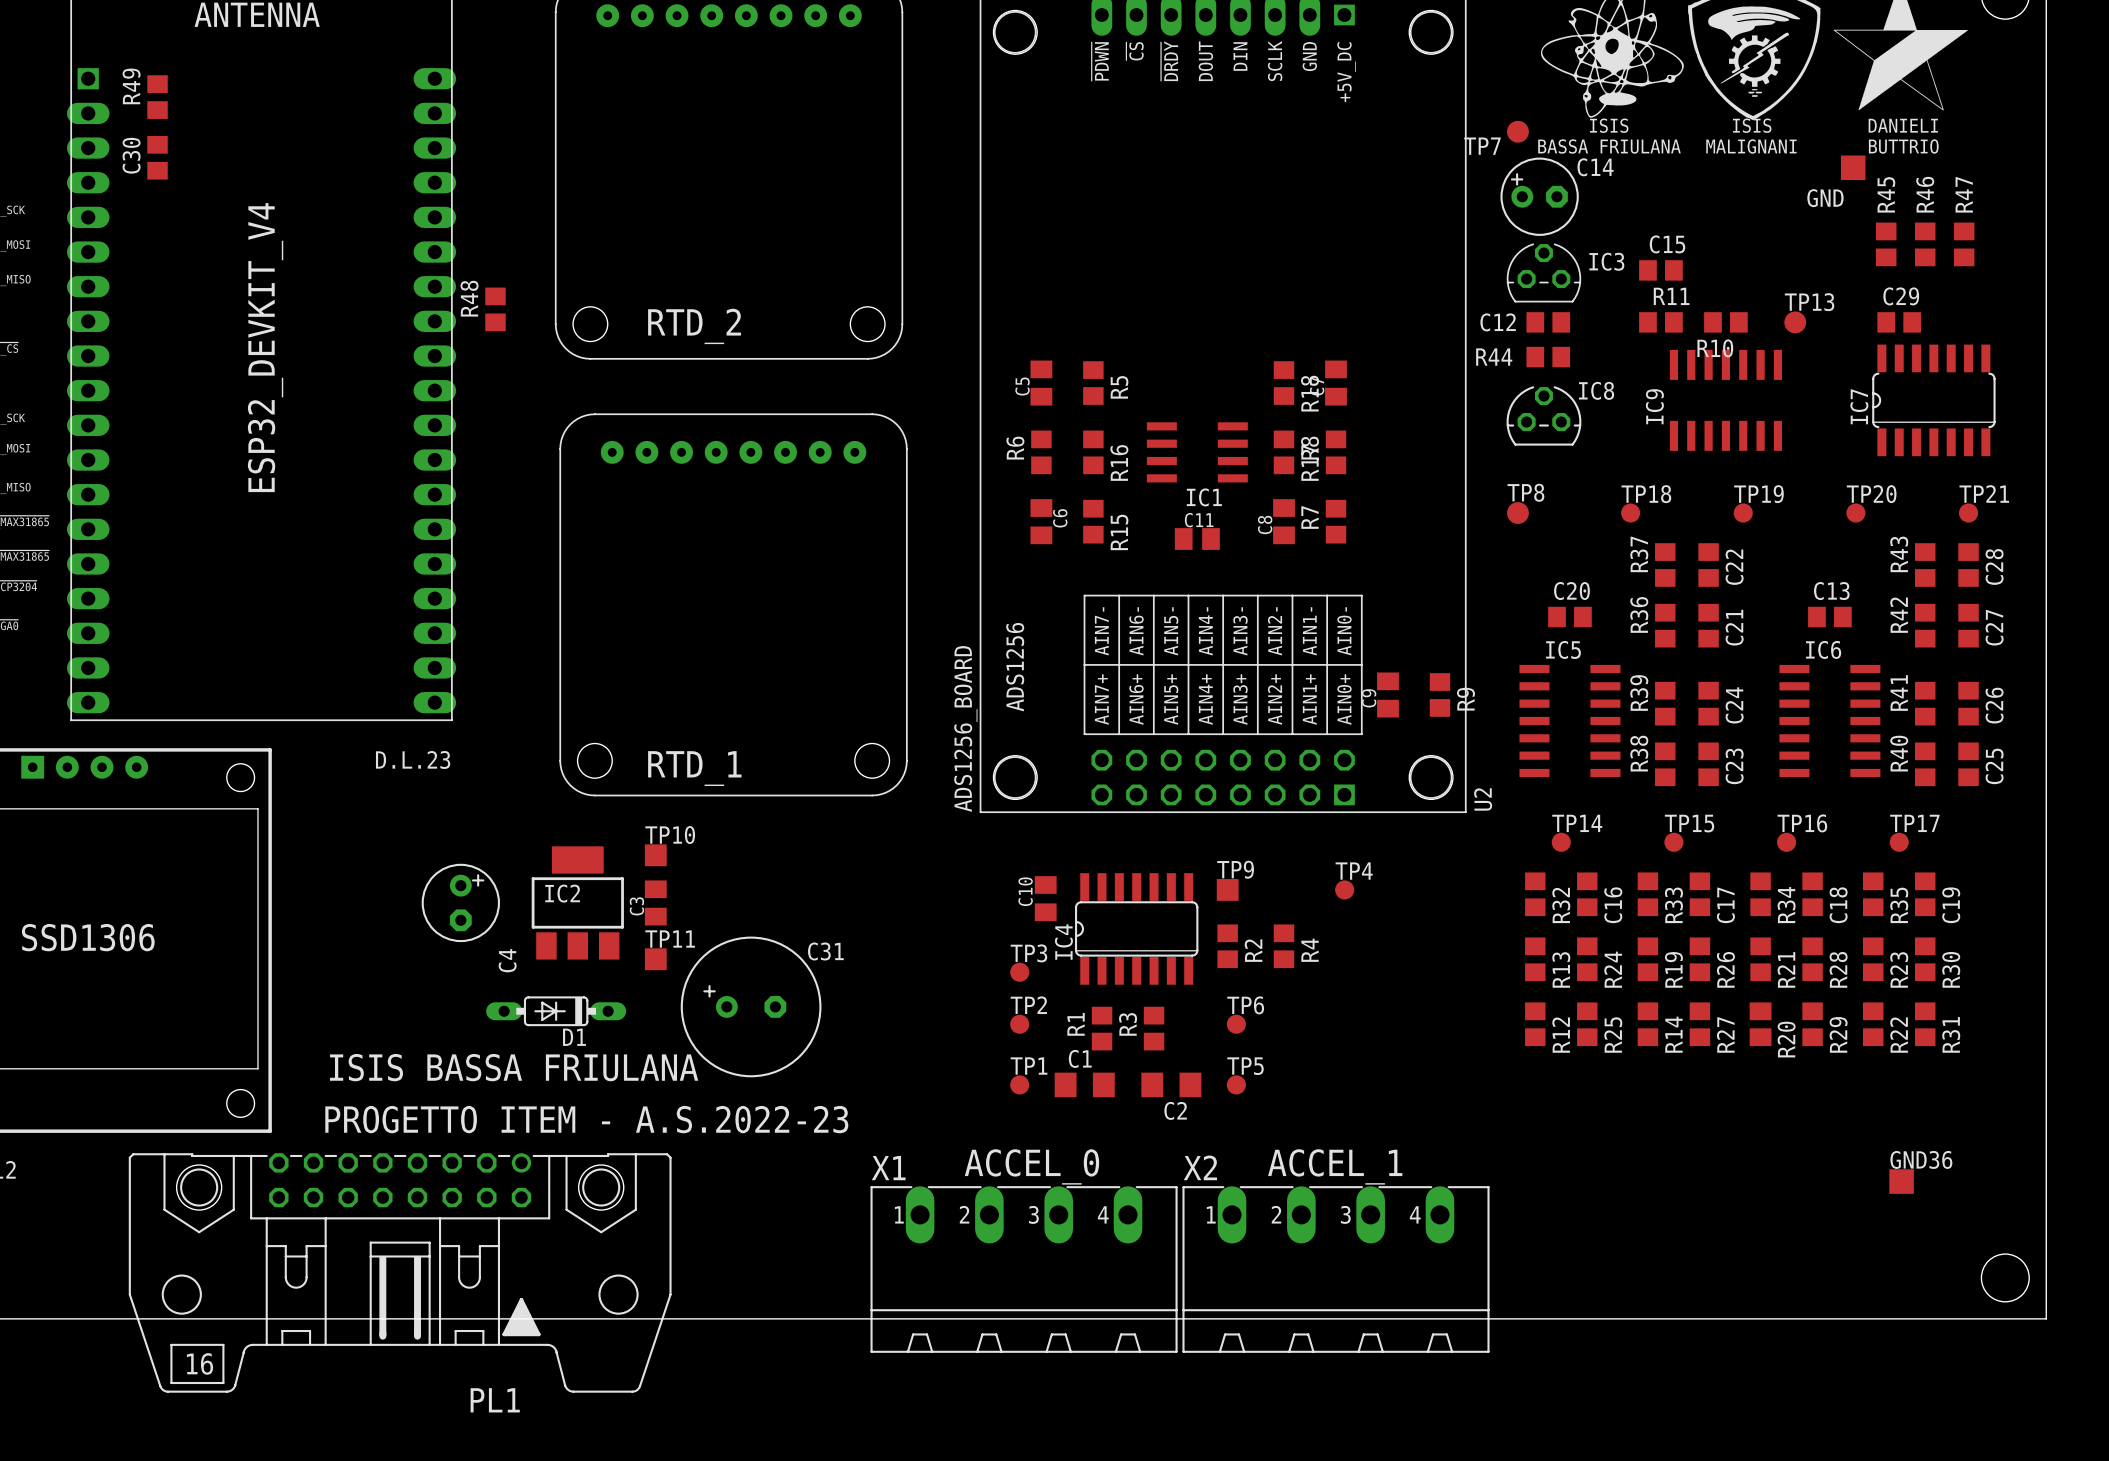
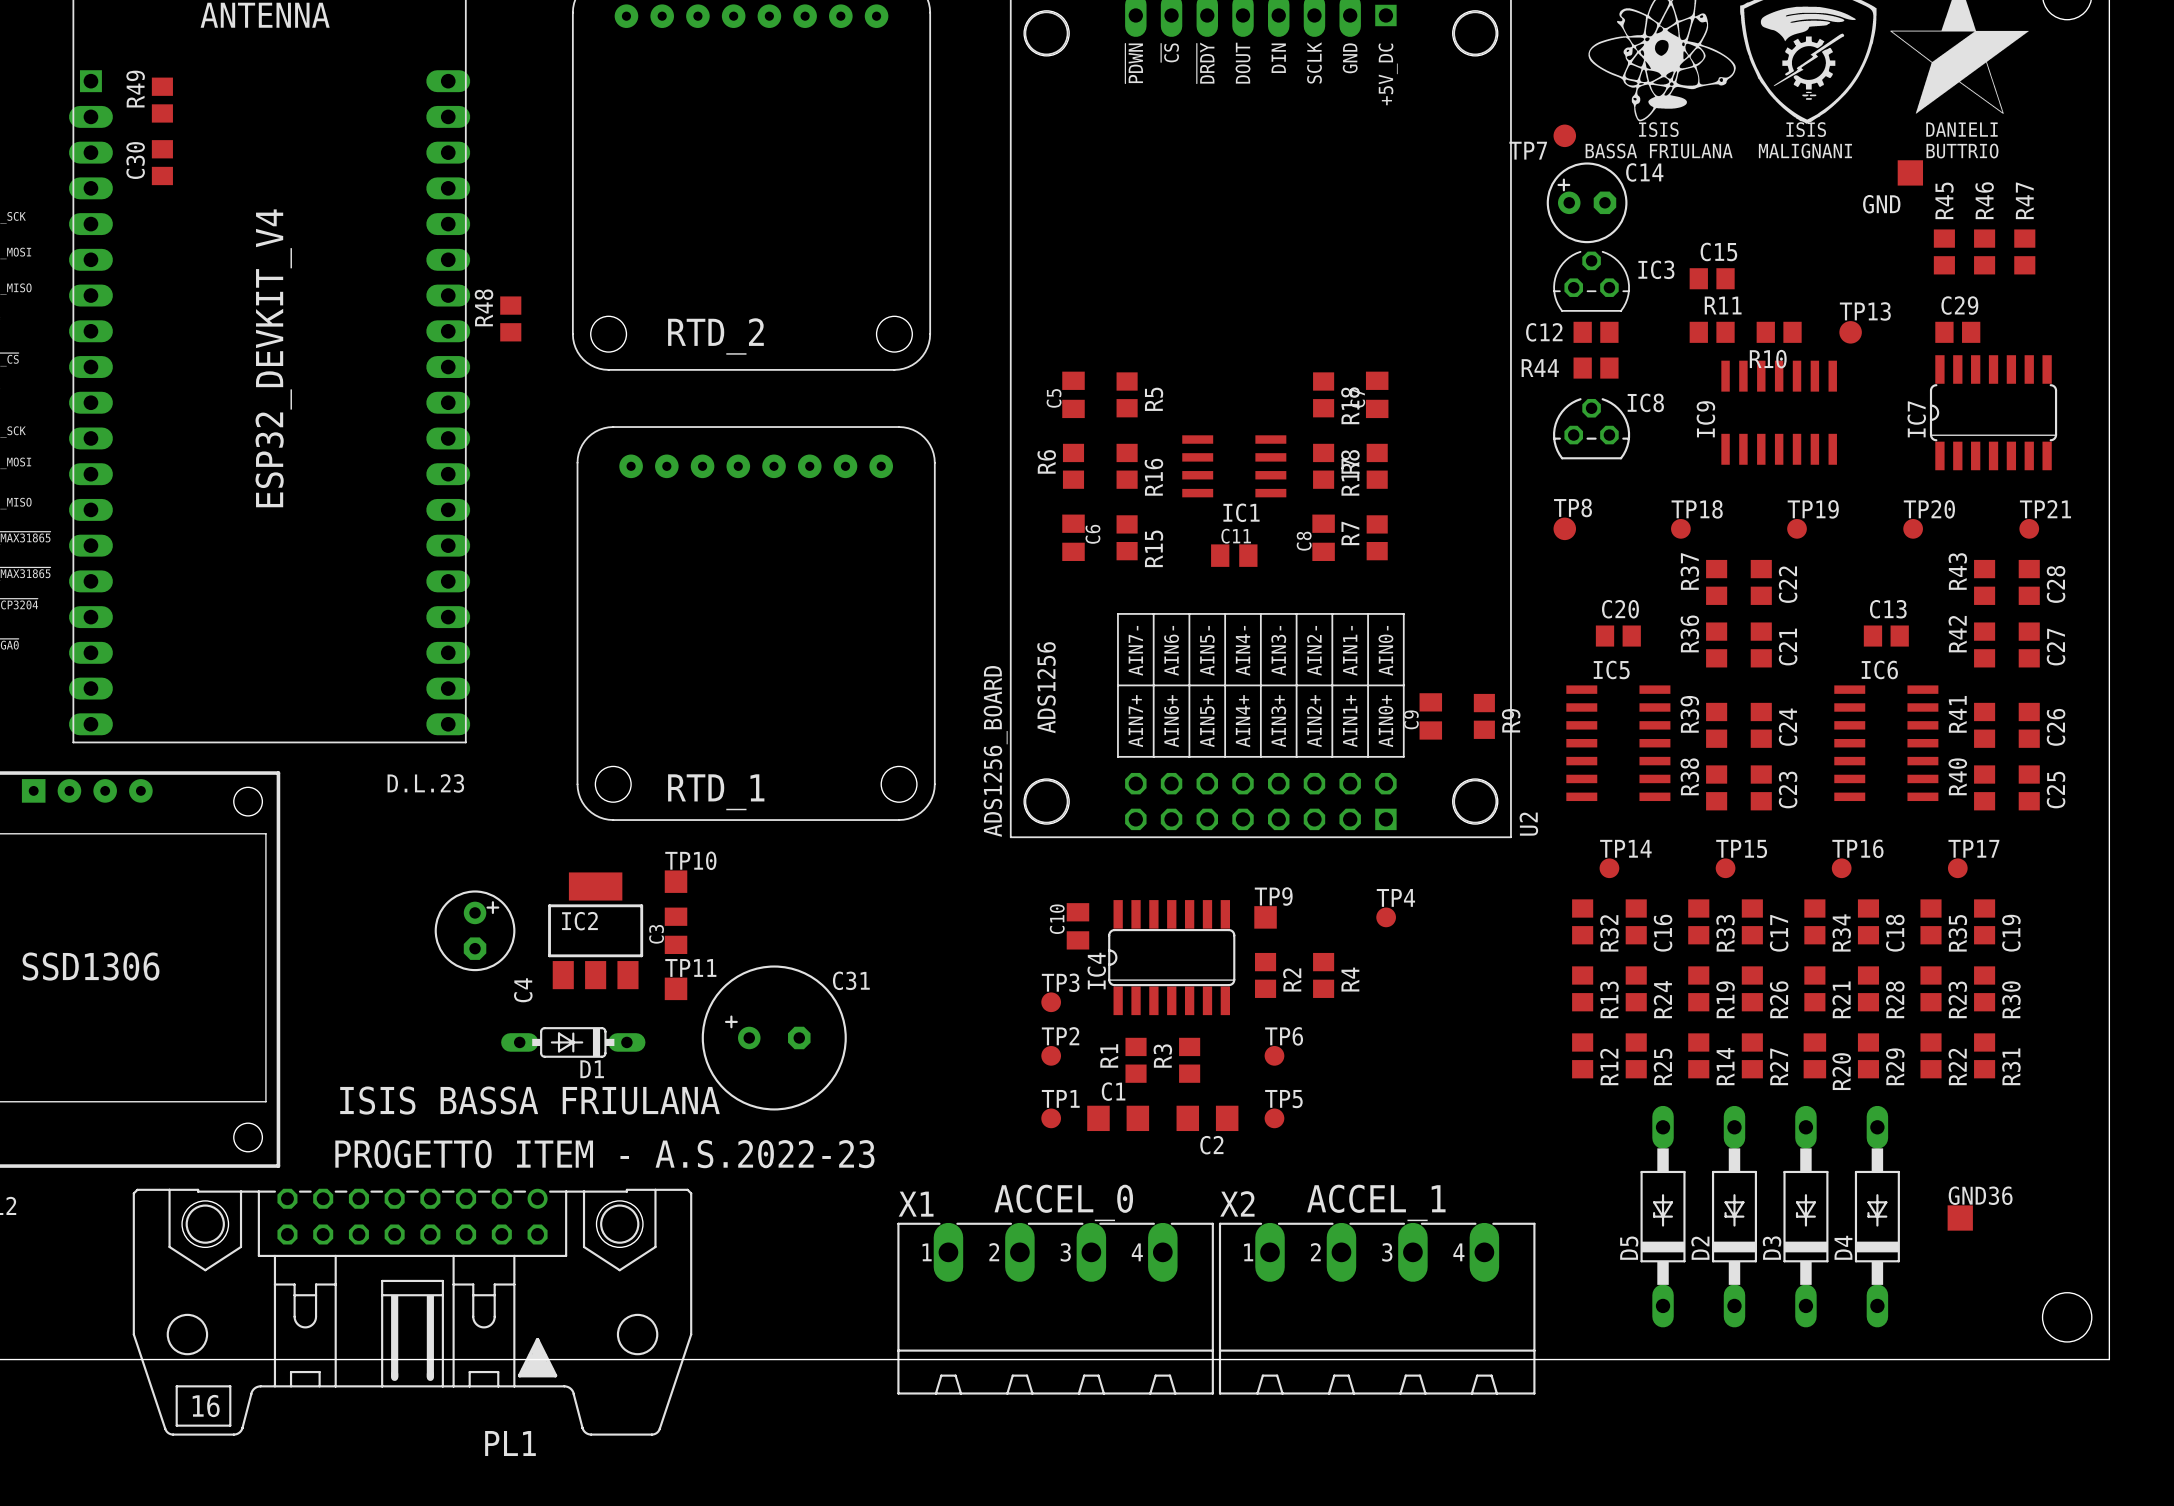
D5: none -> (1663, 1216)
D2: none -> (1734, 1216)
D3: none -> (1805, 1216)
D4: none -> (1877, 1216)

